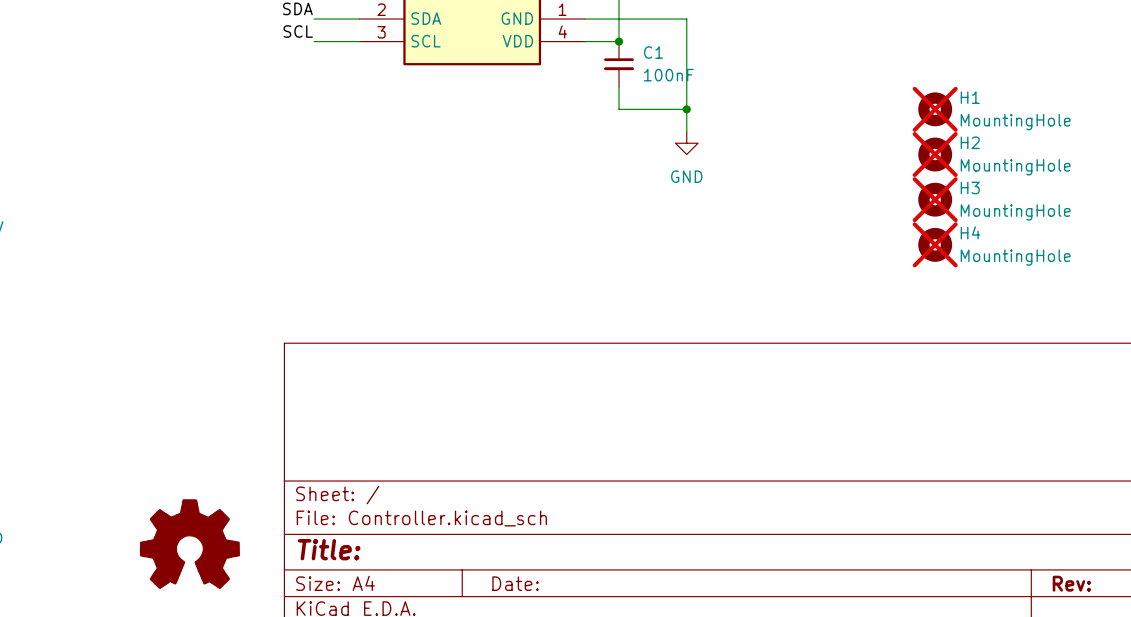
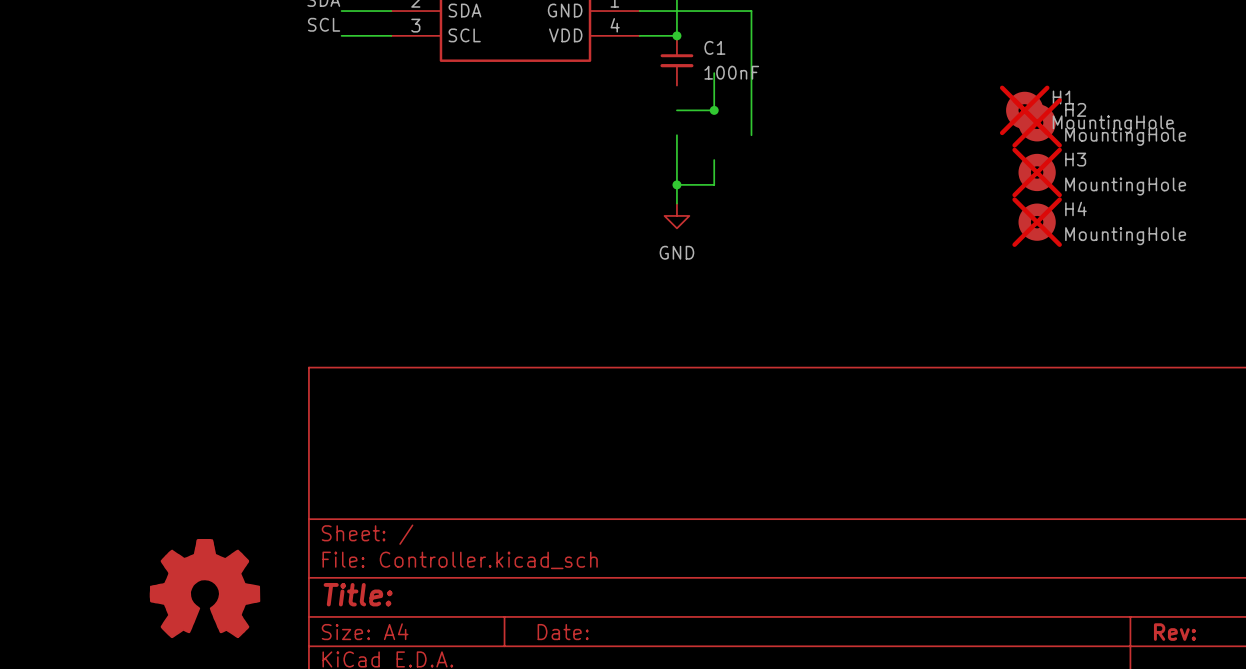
wire: (619, 86) (619, 109) -> none
wire: (652, 109) (686, 109) -> (714, 110) (714, 73)
junction position: (686, 109) -> (714, 110)
wire: none -> (676, 135) (676, 203)
power symbol position: GND (686, 143) -> GND (676, 215)
wire: none -> (714, 160) (714, 184) (676, 184)
H2 position: (935, 154) -> (1037, 122)
junction: none -> (676, 184)
H3 position: (935, 199) -> (1037, 172)
H4 position: (935, 244) -> (1037, 222)

